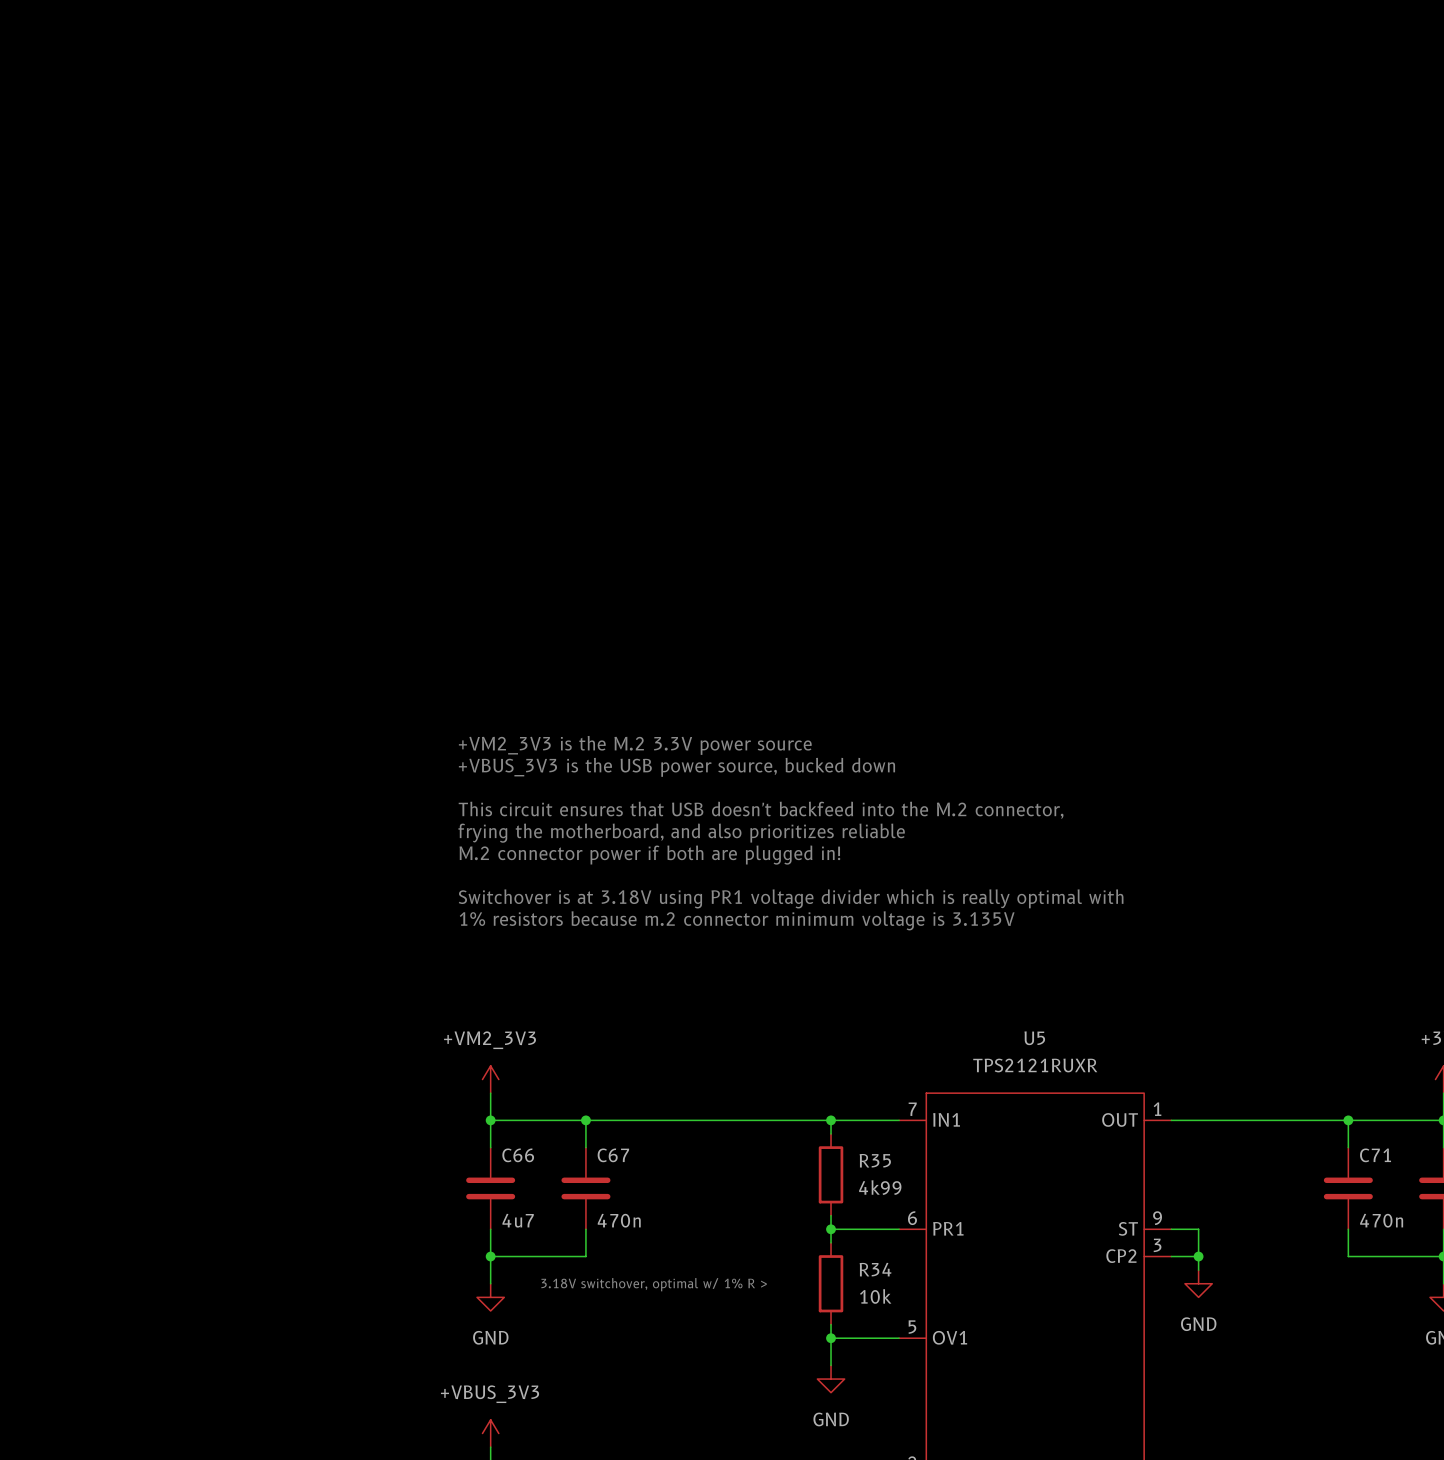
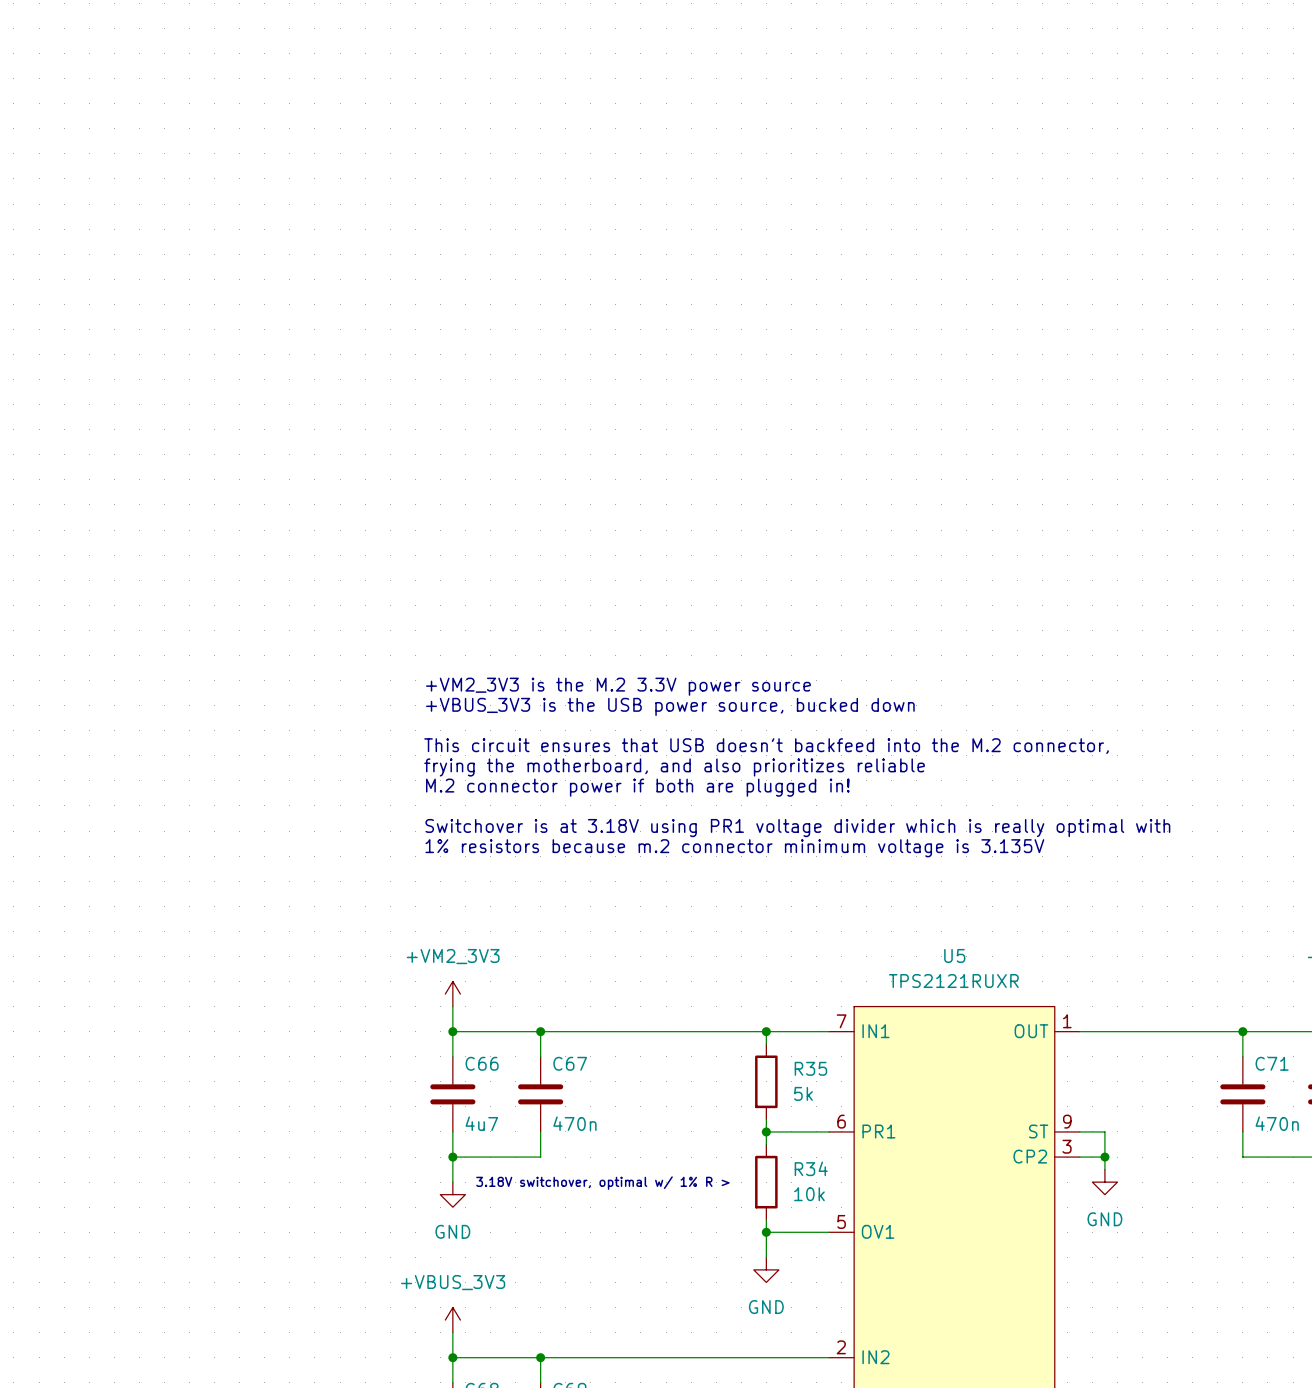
R35 value: 4k99 (880, 1187) -> 5k (803, 1093)

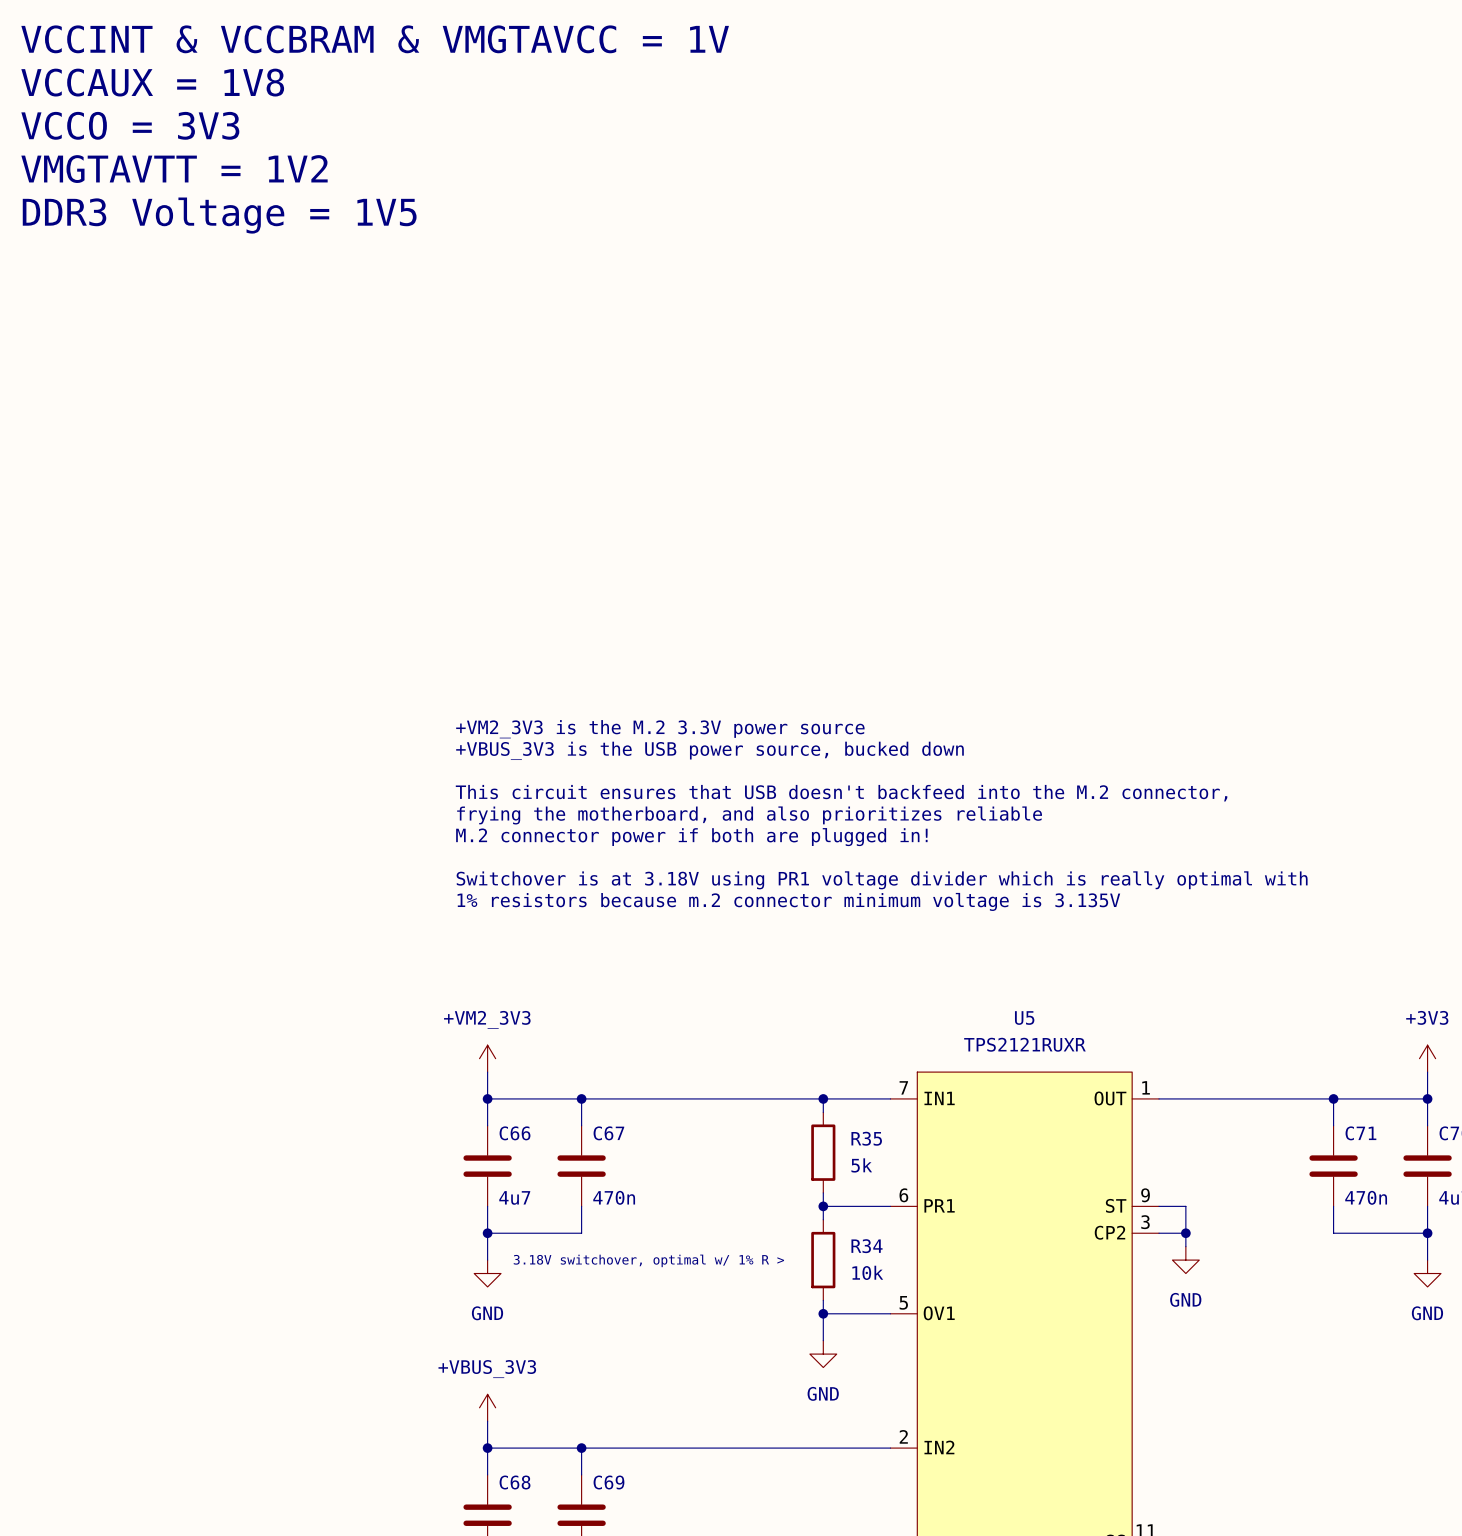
text: none -> VCCINT & VCCBRAM & VMGTAVCC = 1V (375, 39)
text: none -> VCCAUX = 1V8 (152, 82)
text: none -> VCCO = 3V3 (130, 125)
text: none -> VMGTAVTT = 1V2 (174, 169)
text: none -> DDR3 Voltage = 1V5 (219, 215)

